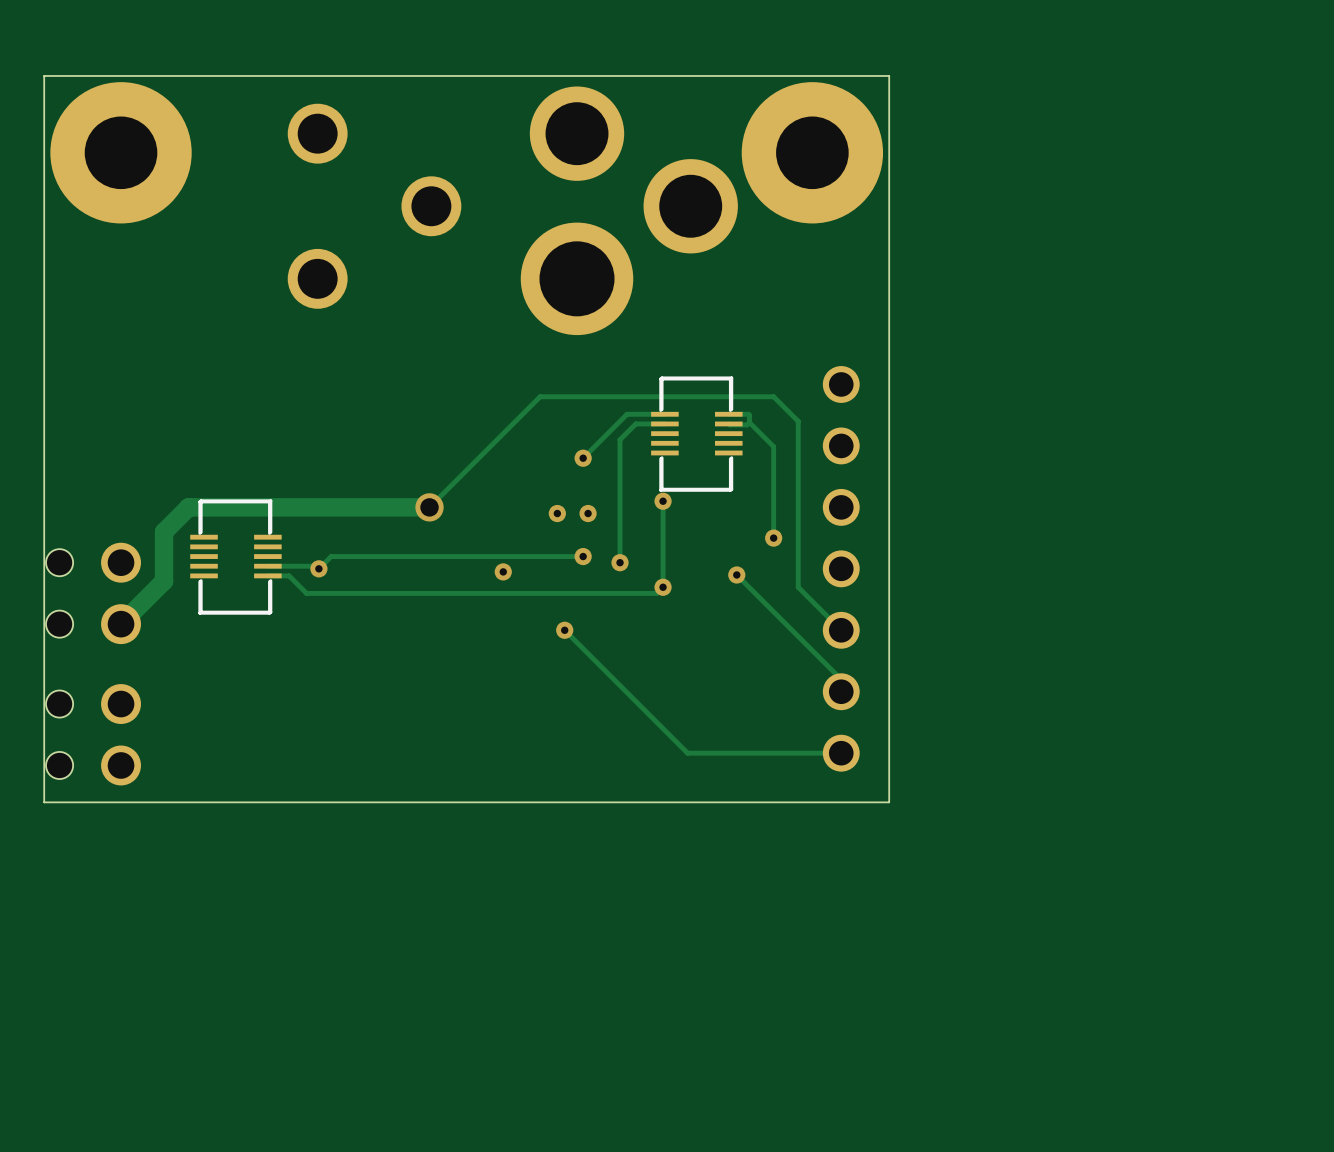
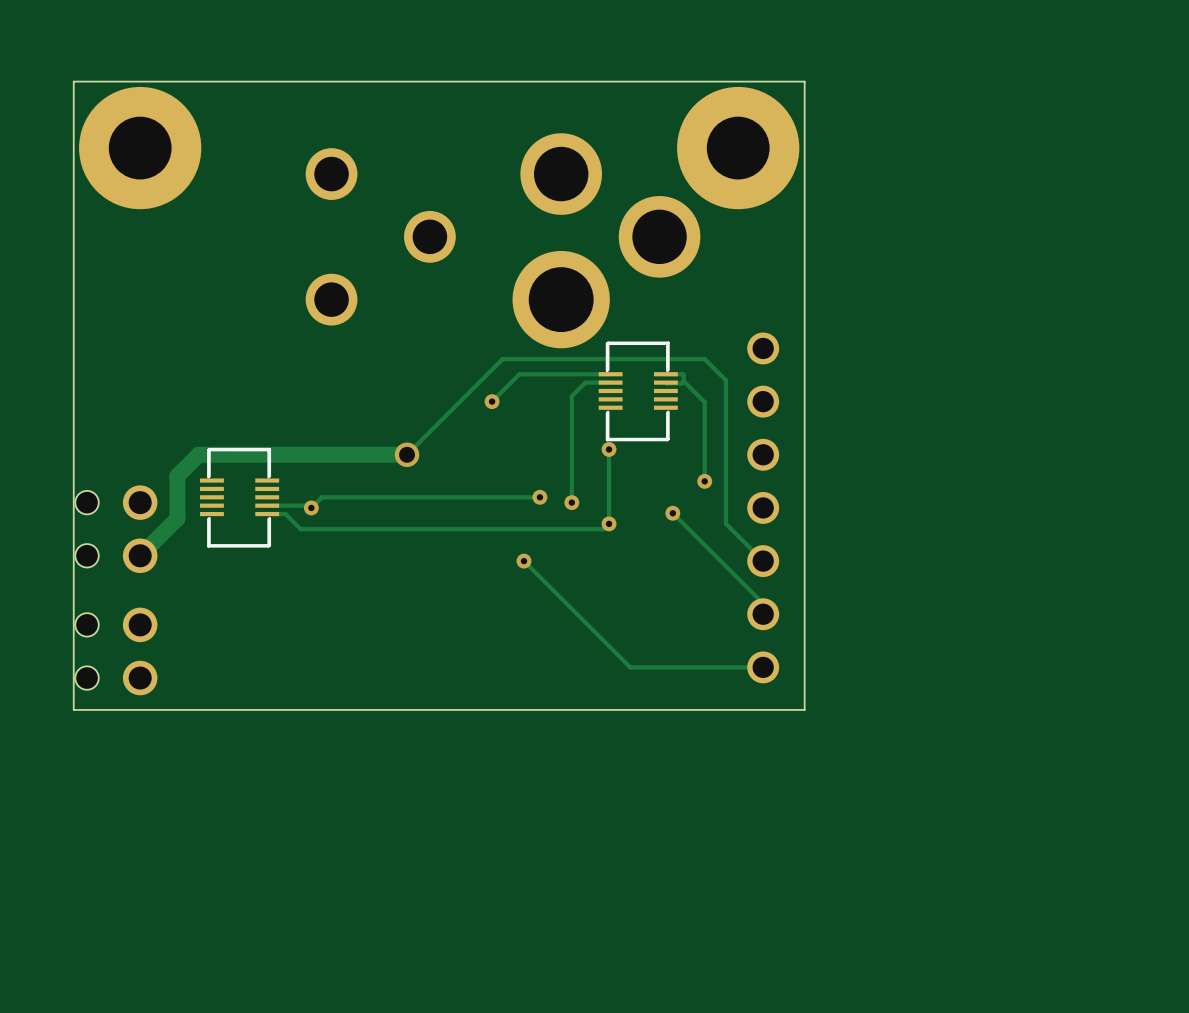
part position: (374, 206) -> (380, 236)
part position: (629, 210) -> (606, 240)
track: (627, 414) (583, 458) -> (577, 374) (519, 374) (492, 401)
via: none -> (492, 401)
via: (583, 458) -> none
via: (557, 513) -> none
via: (588, 513) -> none
via: (503, 571) -> none

